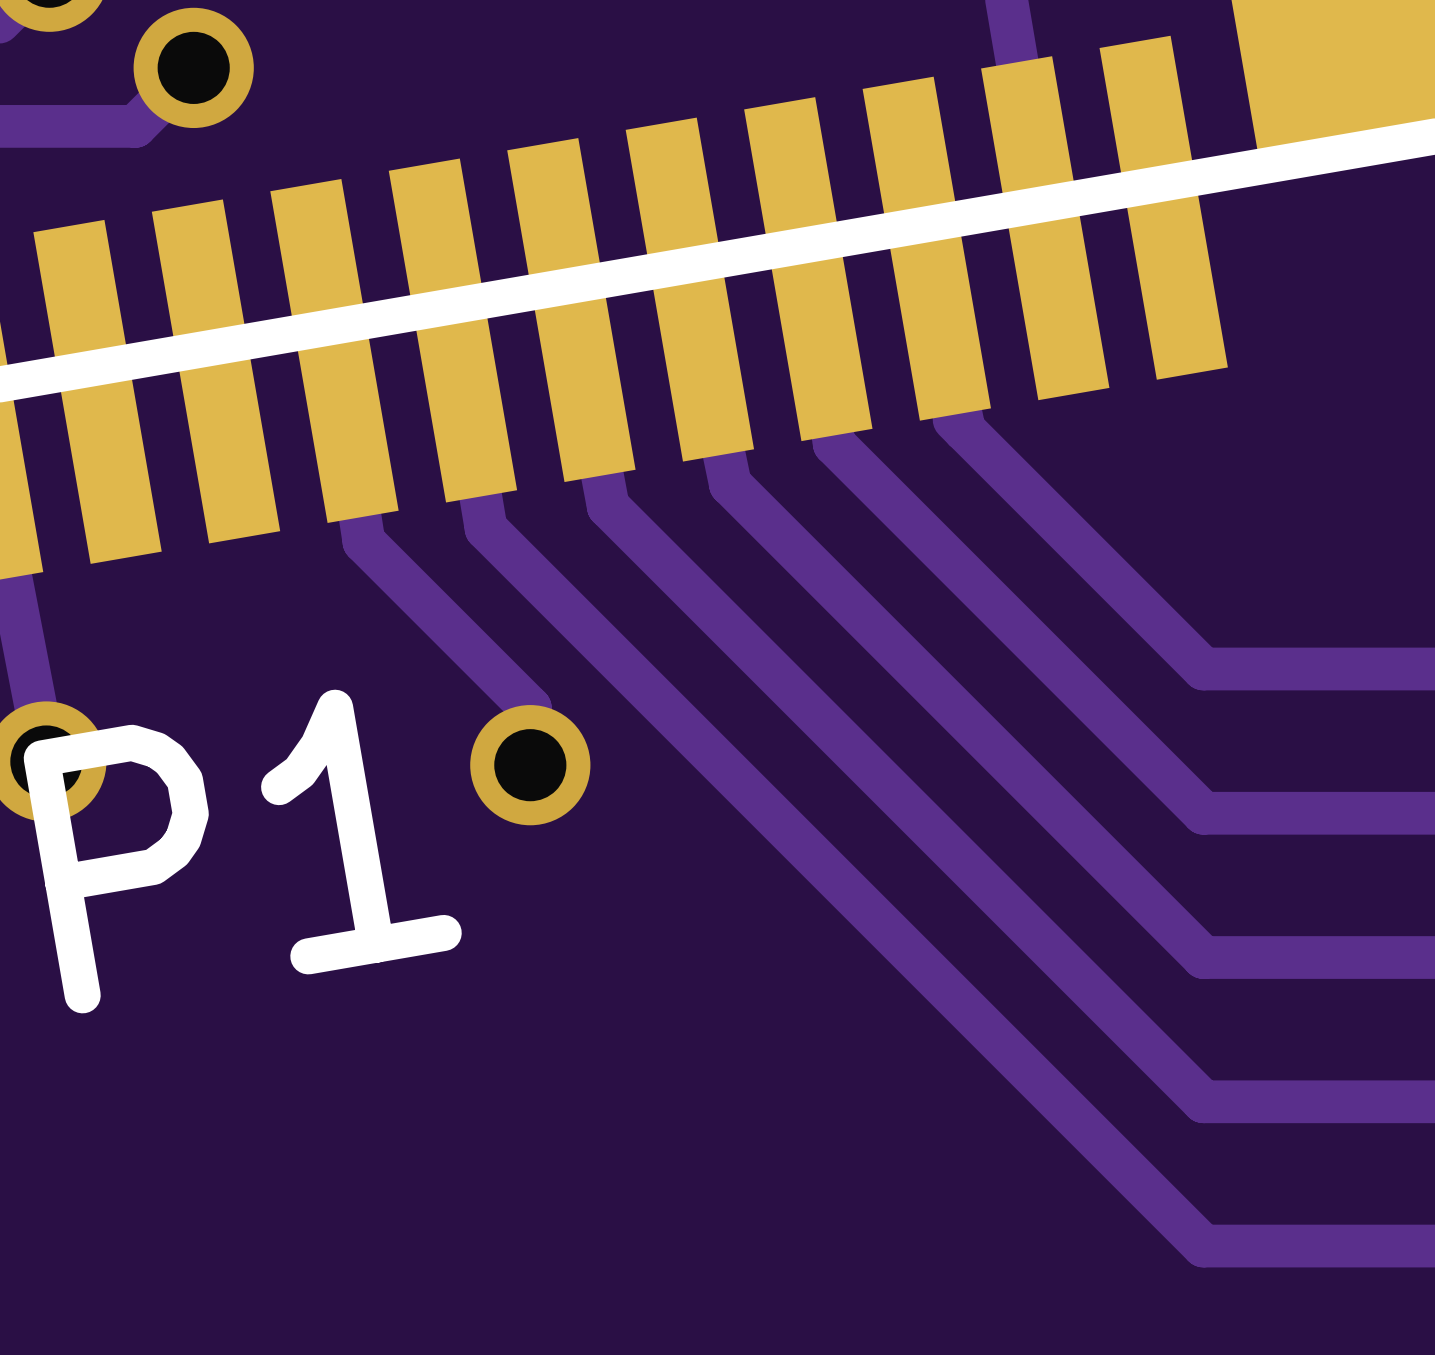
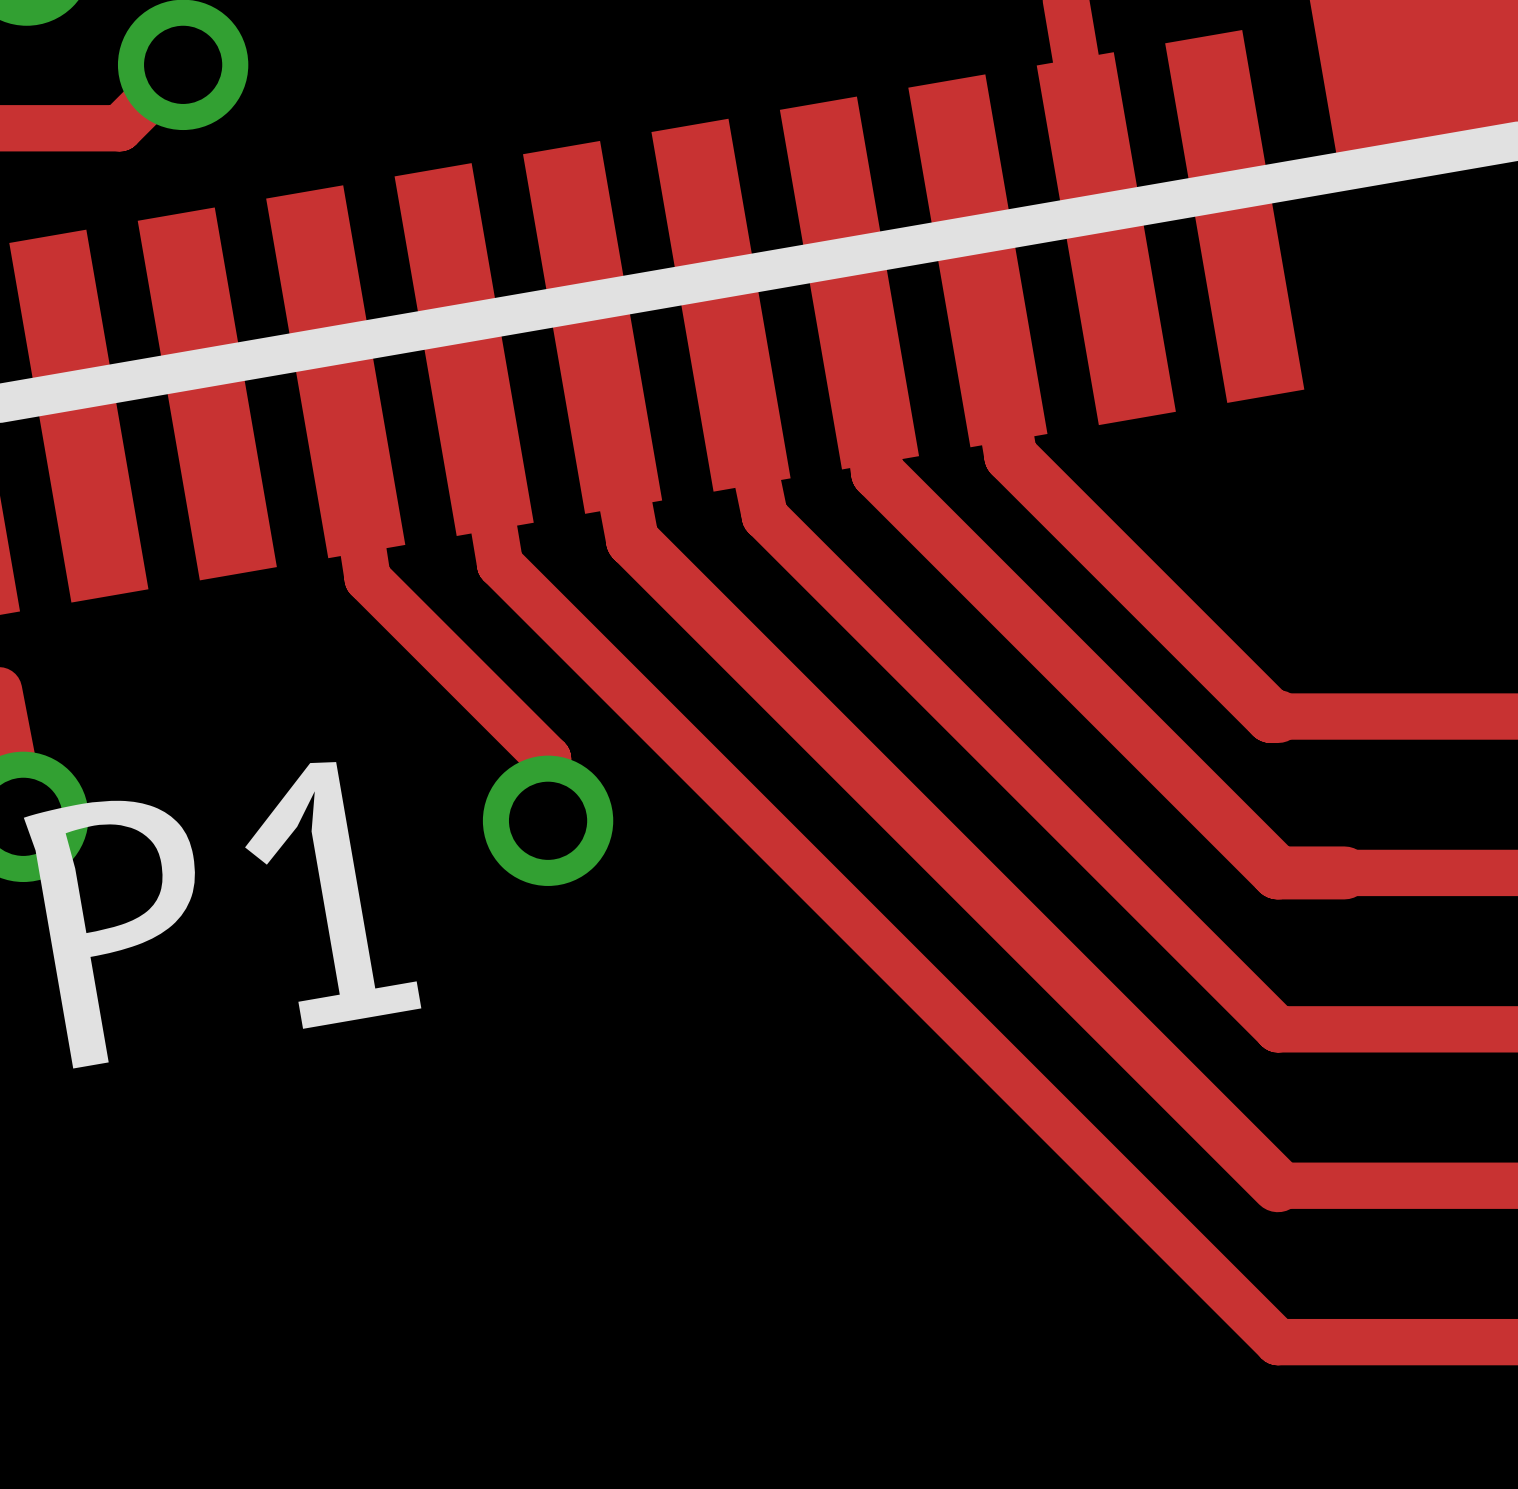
track width: thin (808, 269) (834, 443) (1203, 813) (1264, 813) -> thick (849, 283) (877, 472) (1277, 872) (1344, 872)
track width: thin (571, 310) (608, 506) (1203, 1101) -> thick (592, 327) (632, 540) (1277, 1185)
track: (954, 419) (1203, 668) -> (977, 260) (1010, 455) (1271, 716) (1277, 716)

